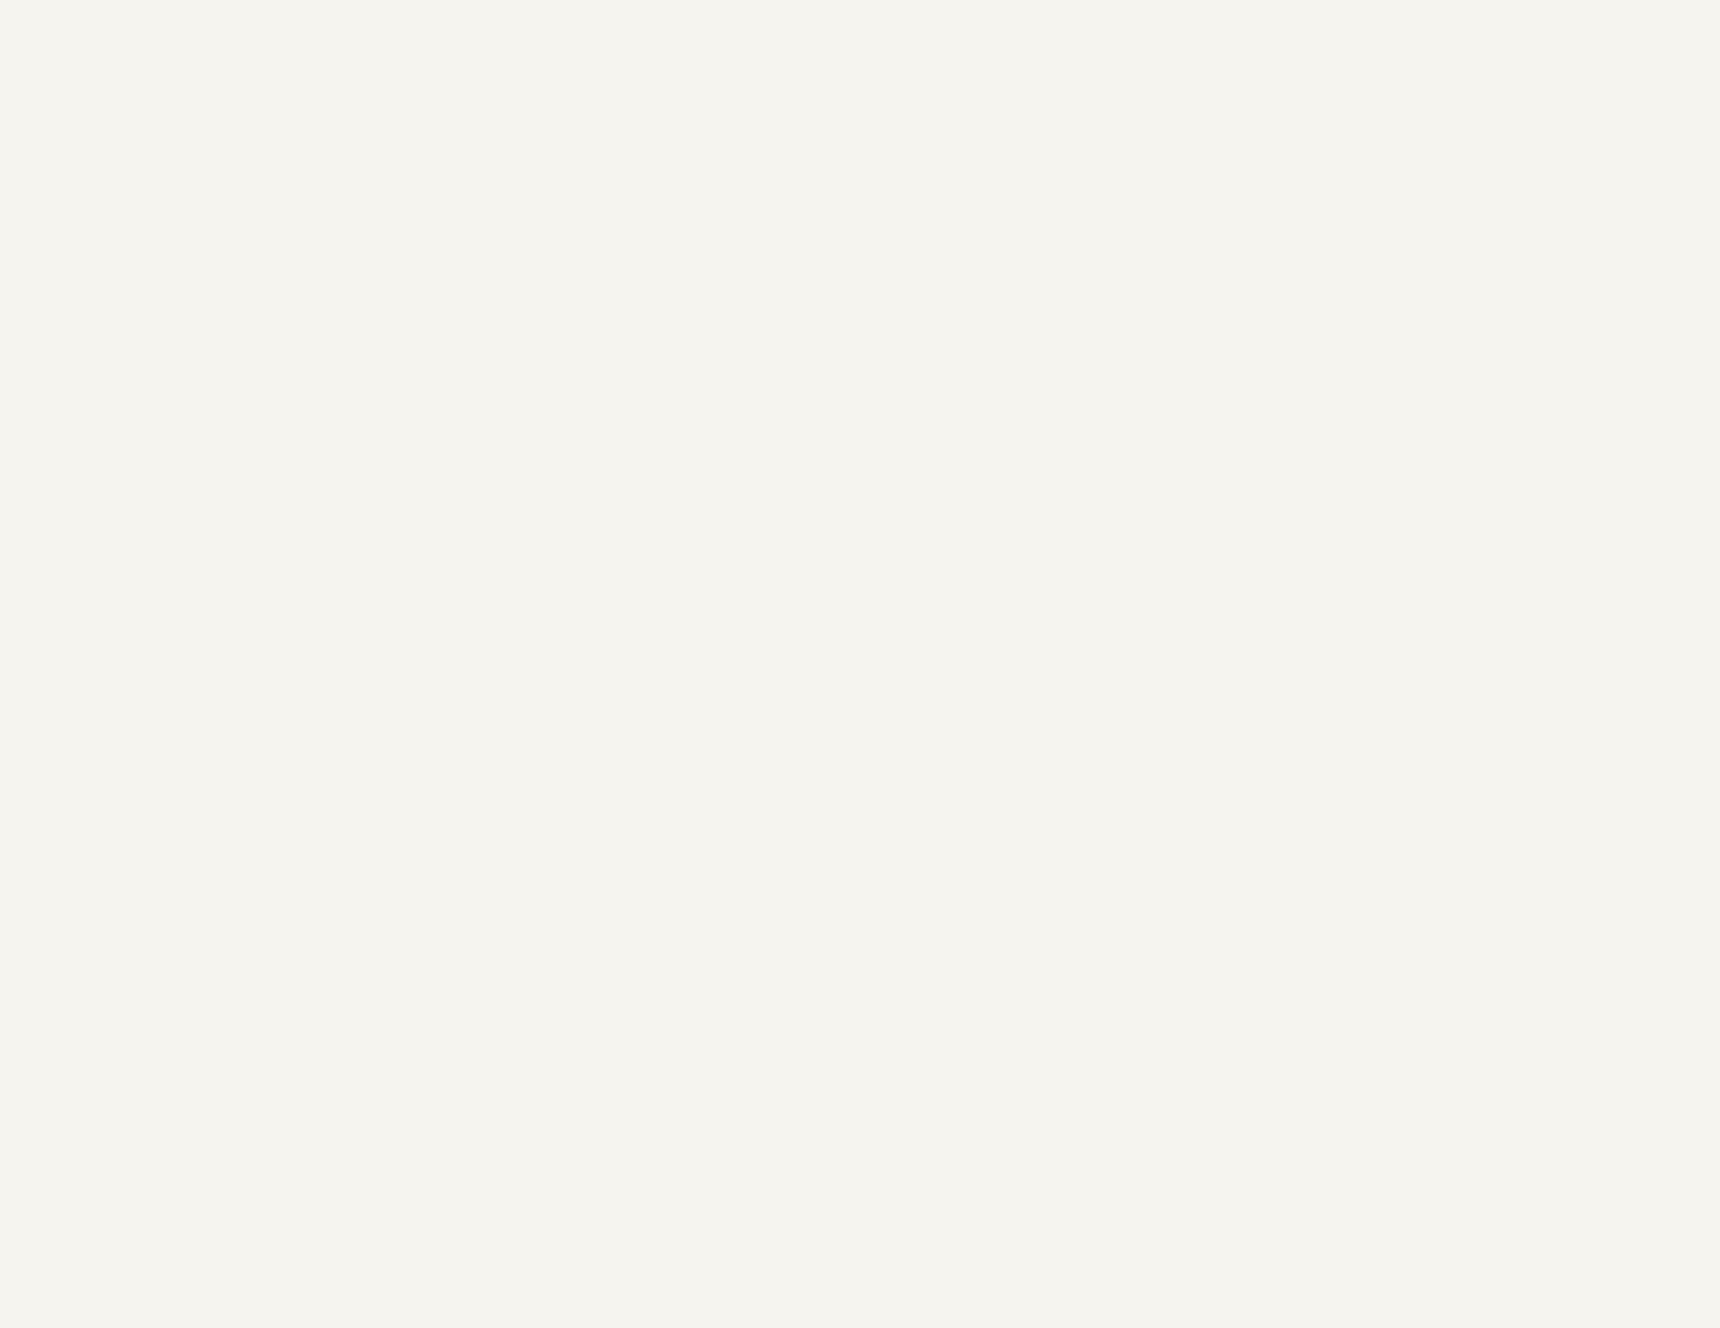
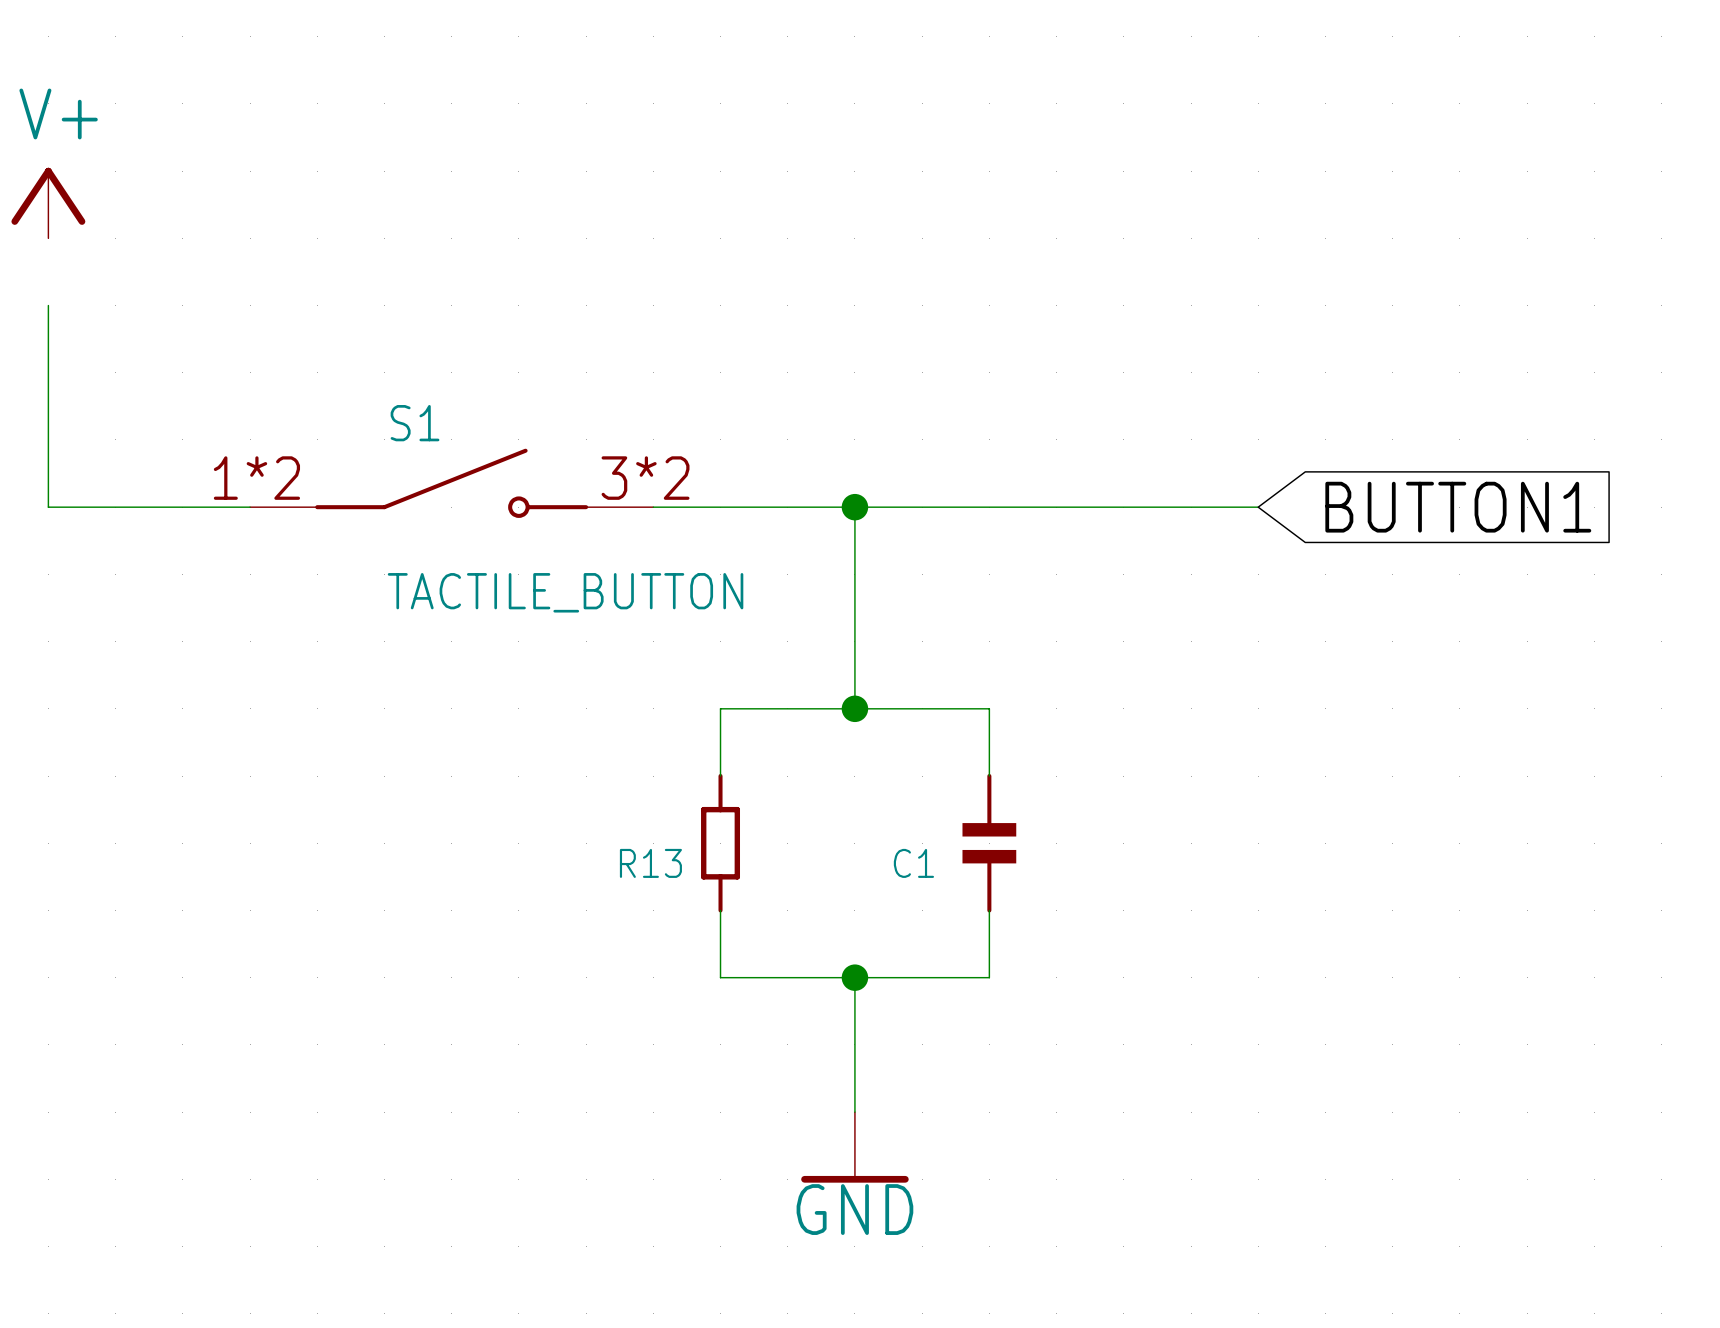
power symbol: none -> V+ (48, 203)
wire: none -> (48, 305) (48, 507) (250, 507)
S1: none -> TACTILE_BUTTON (451, 483)
wire: none -> (653, 507) (1258, 507)
wire: none -> (854, 507) (854, 708)
junction: none -> (854, 507)
global label: none -> BUTTON1 (1458, 507)
junction: none -> (854, 708)
wire: none -> (720, 776) (720, 708) (989, 708) (989, 776)
R13: none -> (720, 843)
C1: none -> (989, 843)
wire: none -> (720, 910) (720, 977) (989, 977) (989, 910)
wire: none -> (854, 977) (854, 1112)
junction: none -> (854, 977)
power symbol: none -> GND (854, 1147)

